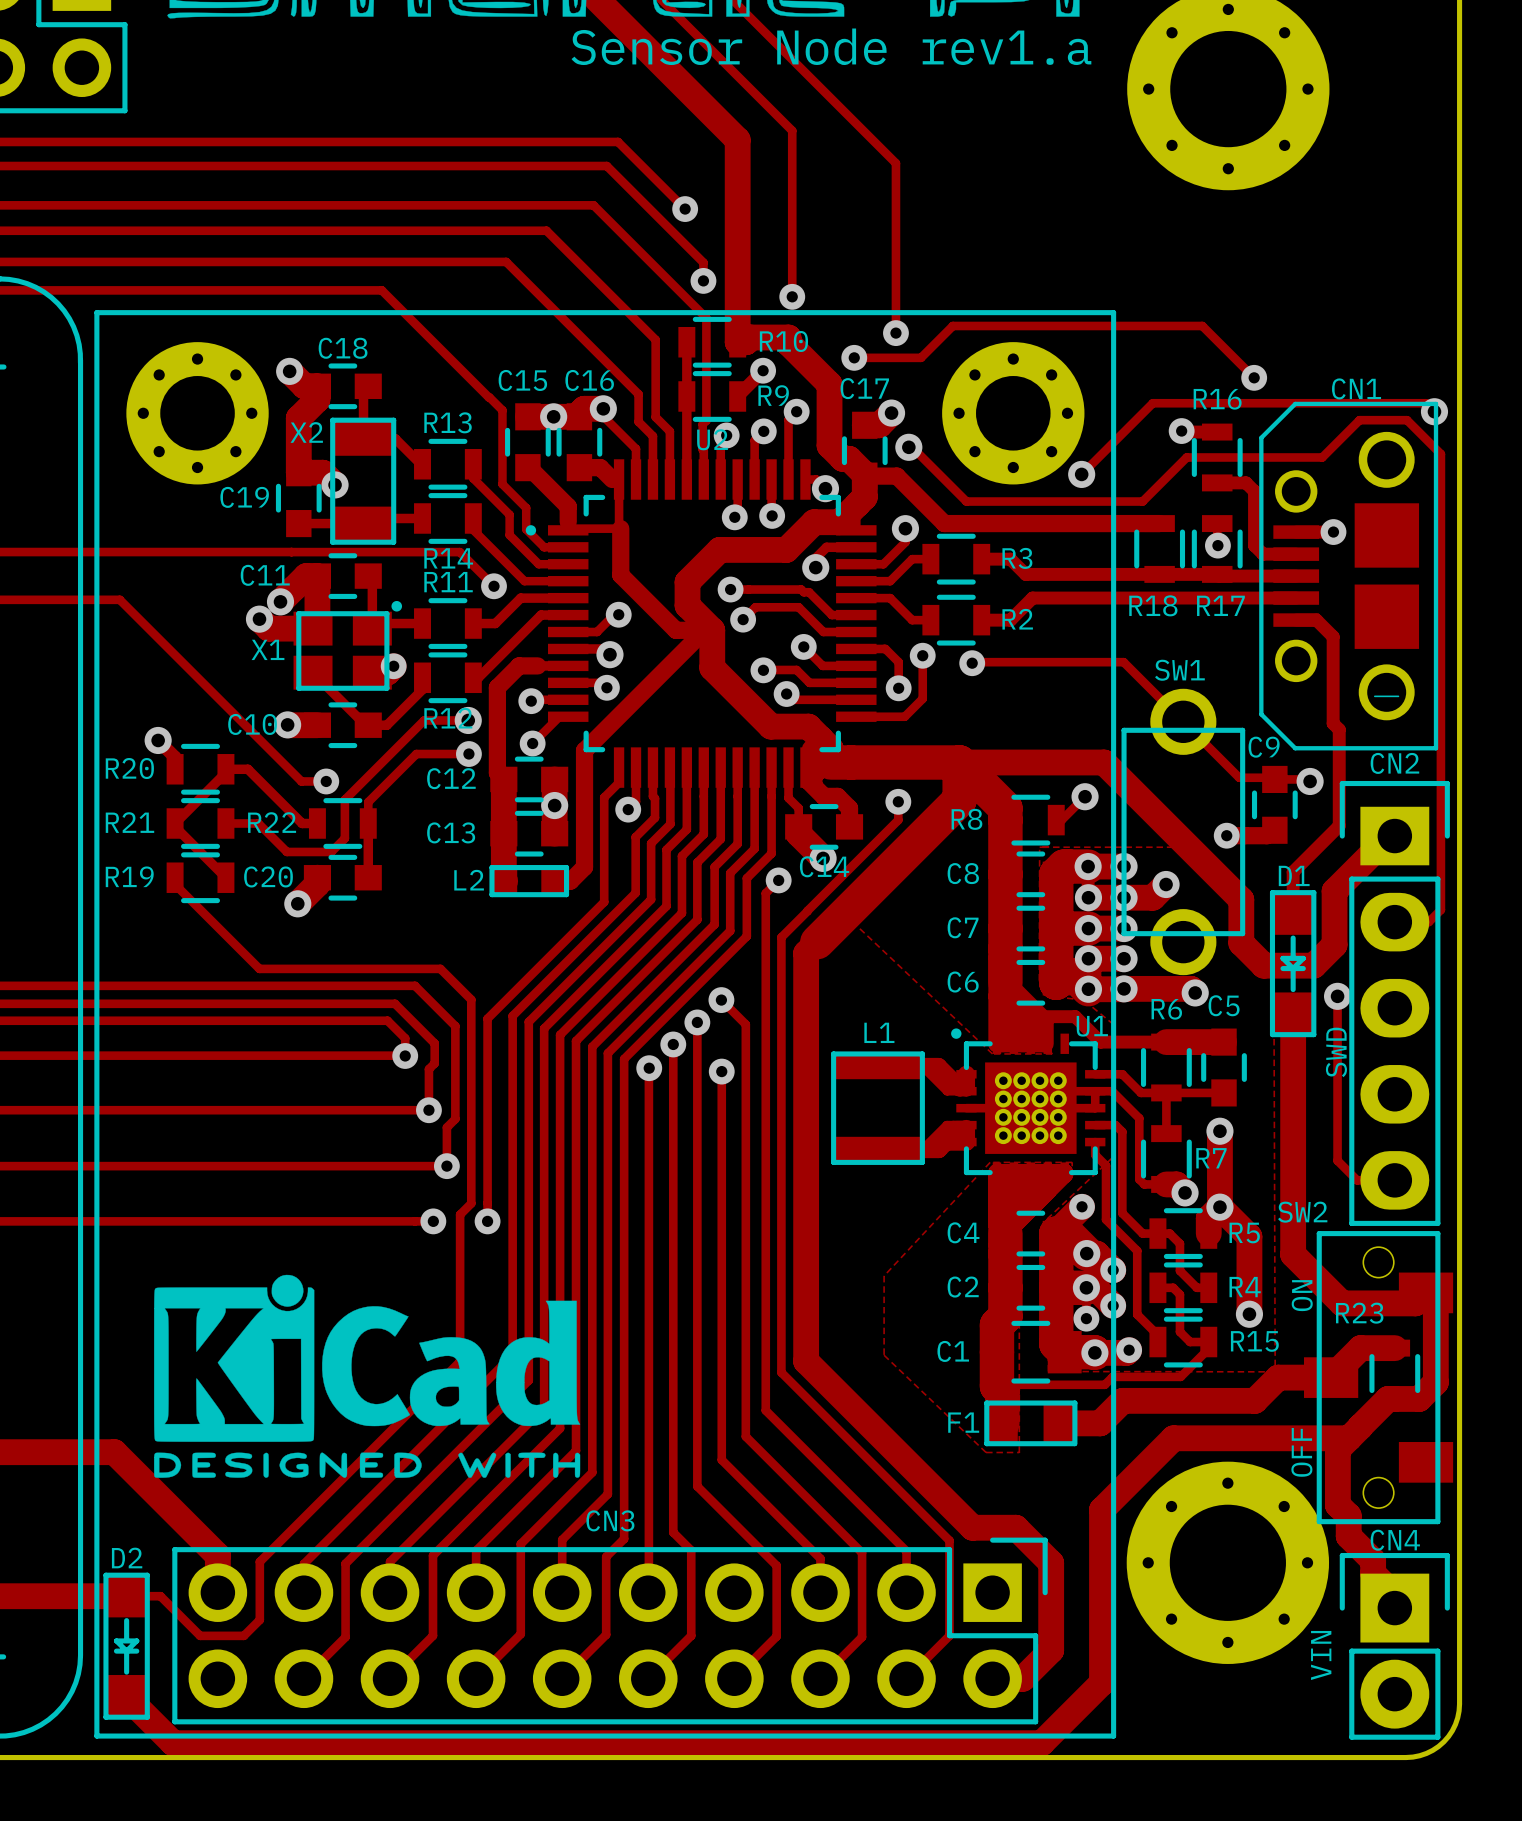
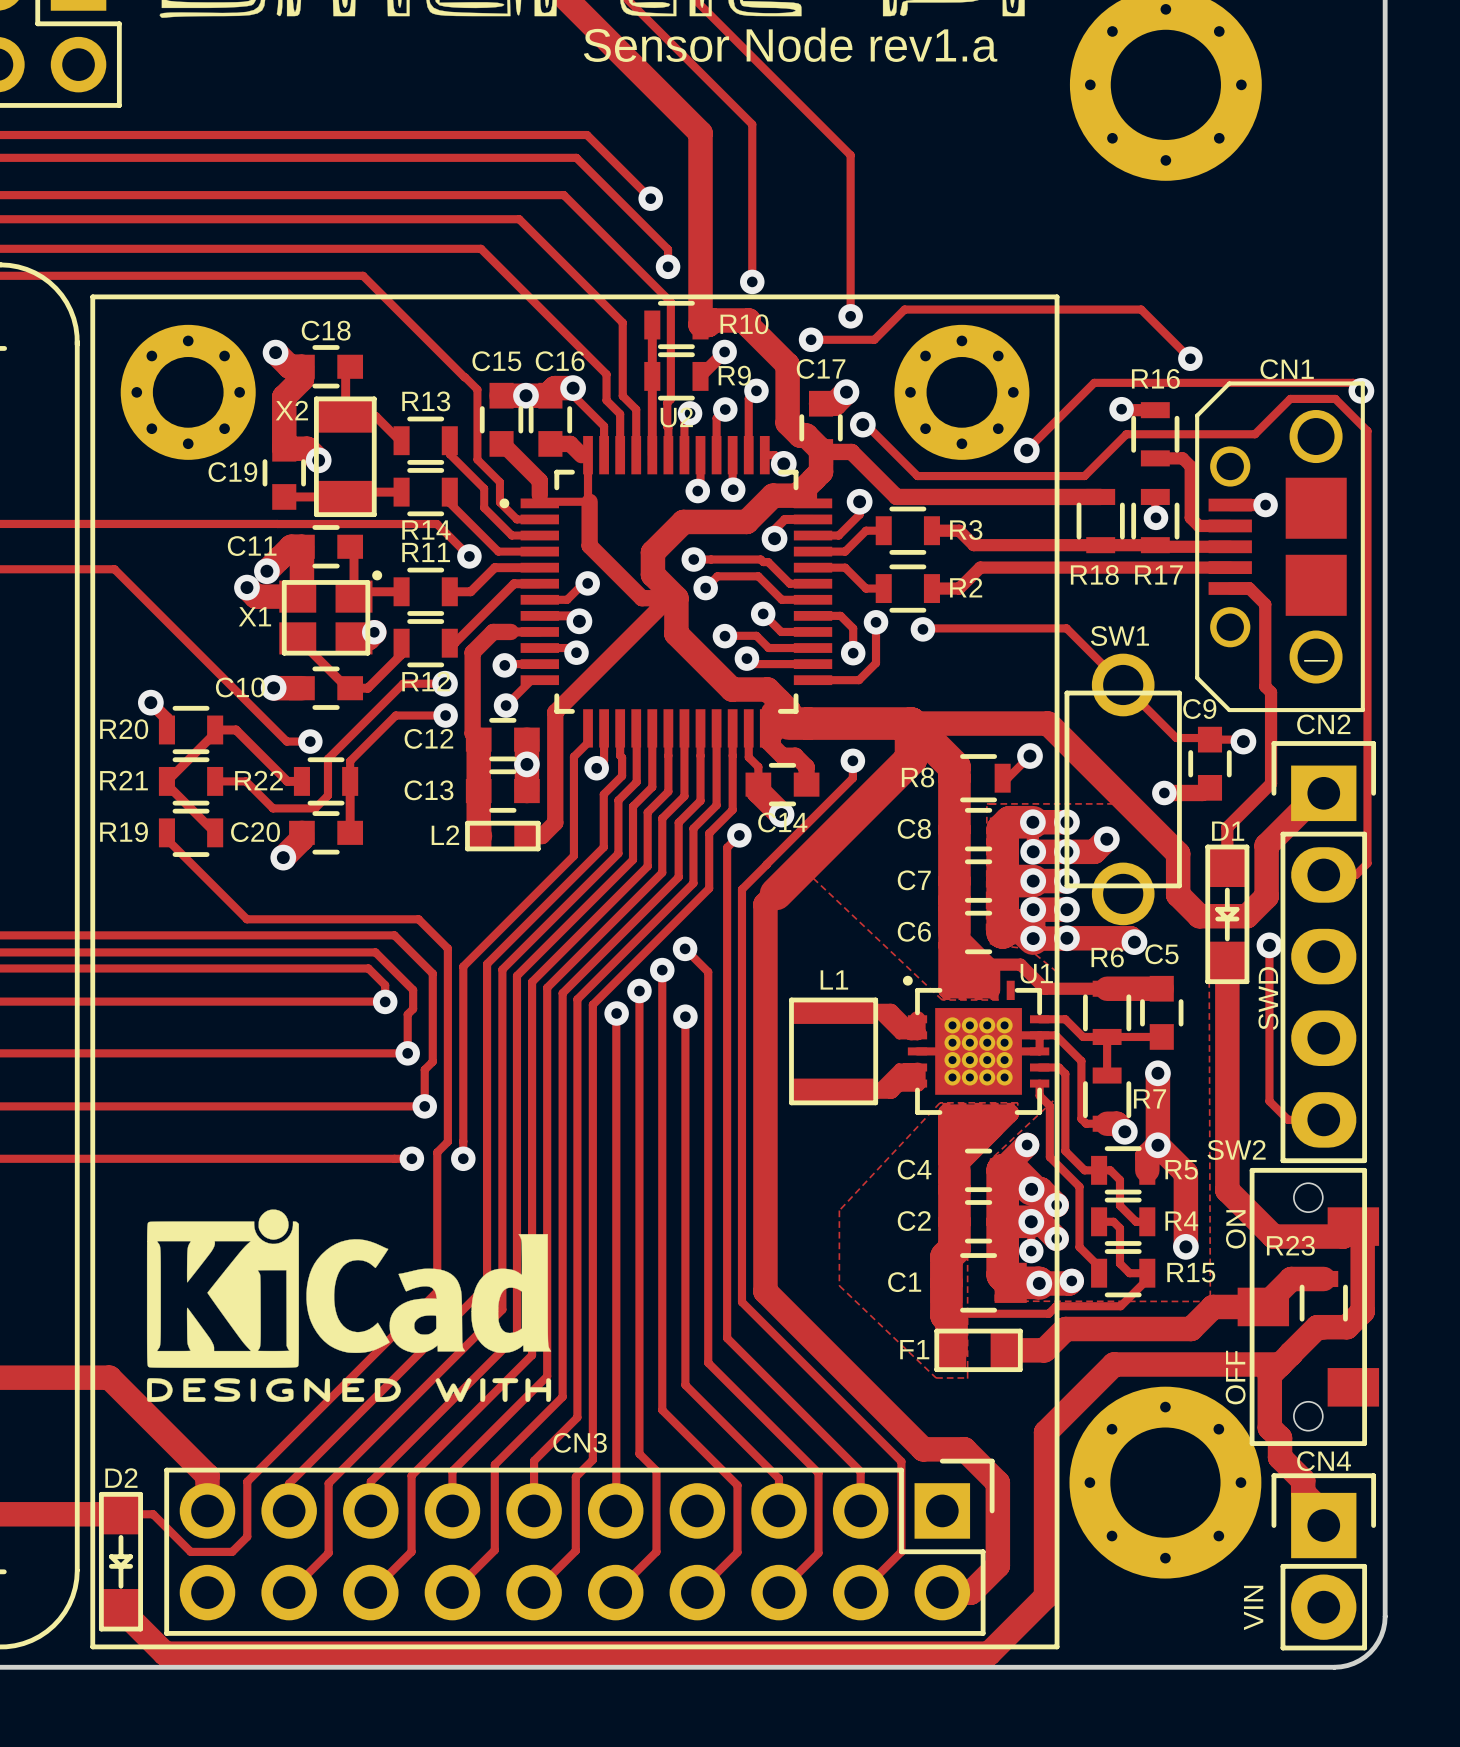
text position: VIN (1321, 1655) -> VIN (1253, 1607)

